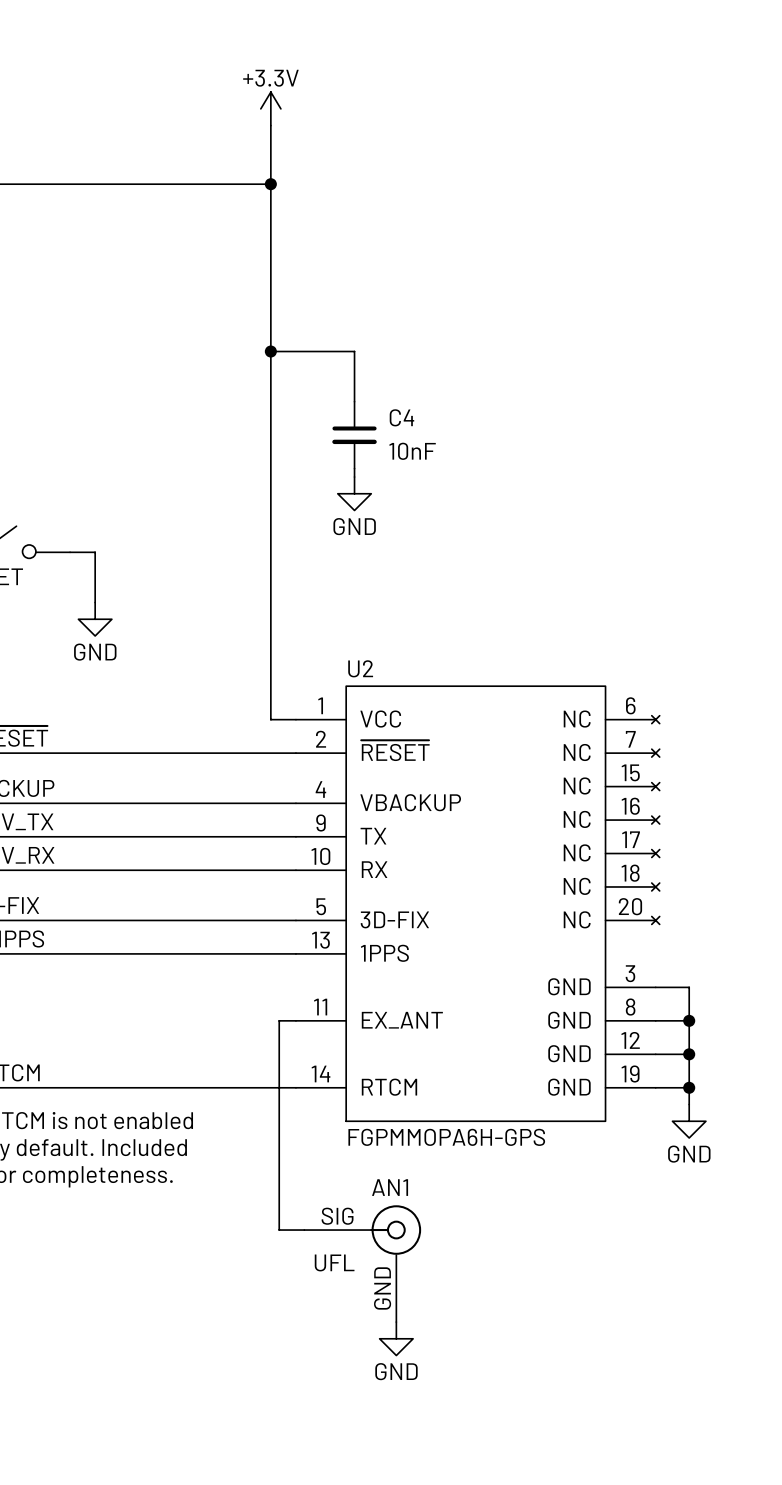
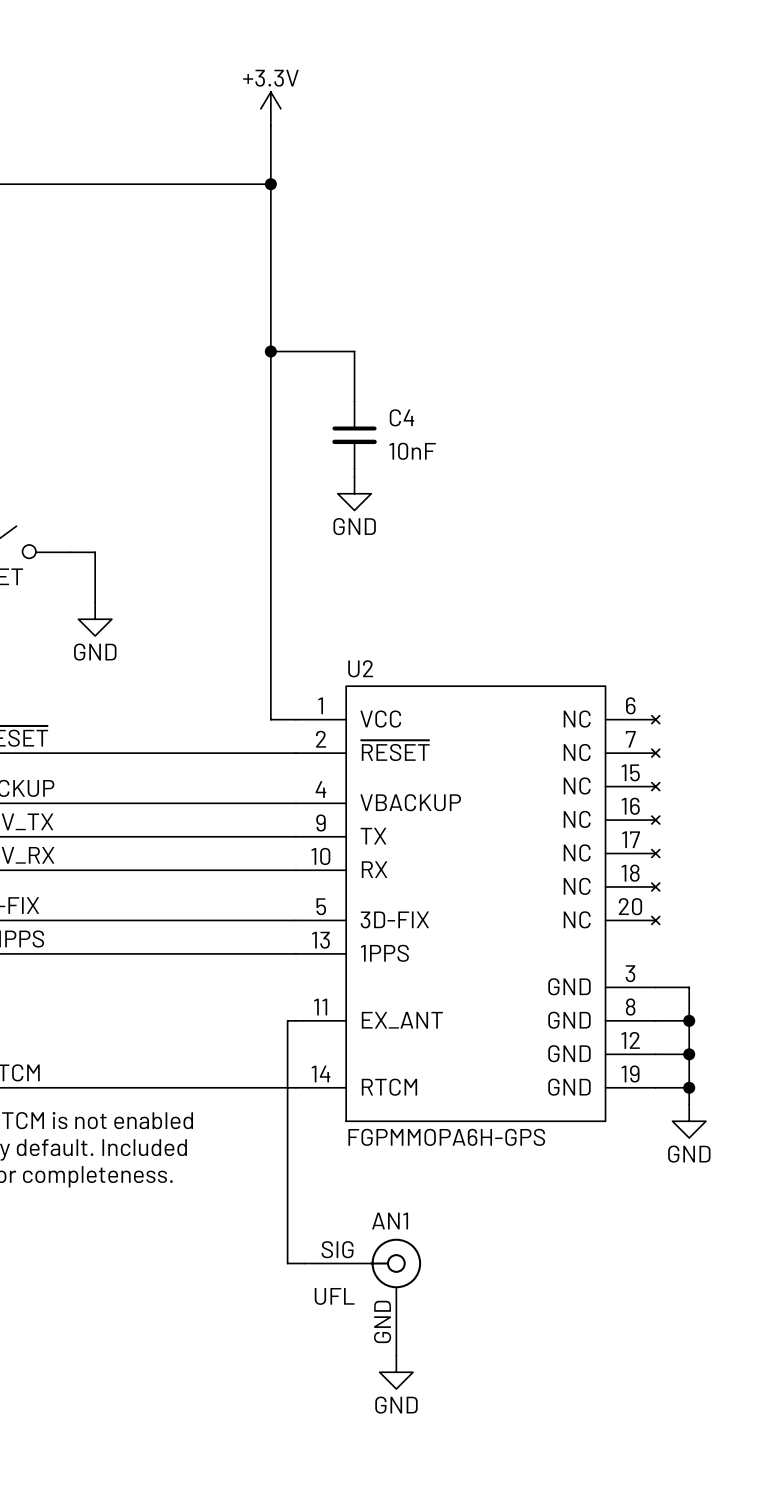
wire: (287, 1020) (279, 1020) (279, 1230) (304, 1230) -> (287, 1020) (287, 1263) (304, 1263)
AN1 position: (362, 1263) -> (362, 1297)
power symbol position: GND (396, 1338) -> GND (396, 1372)

